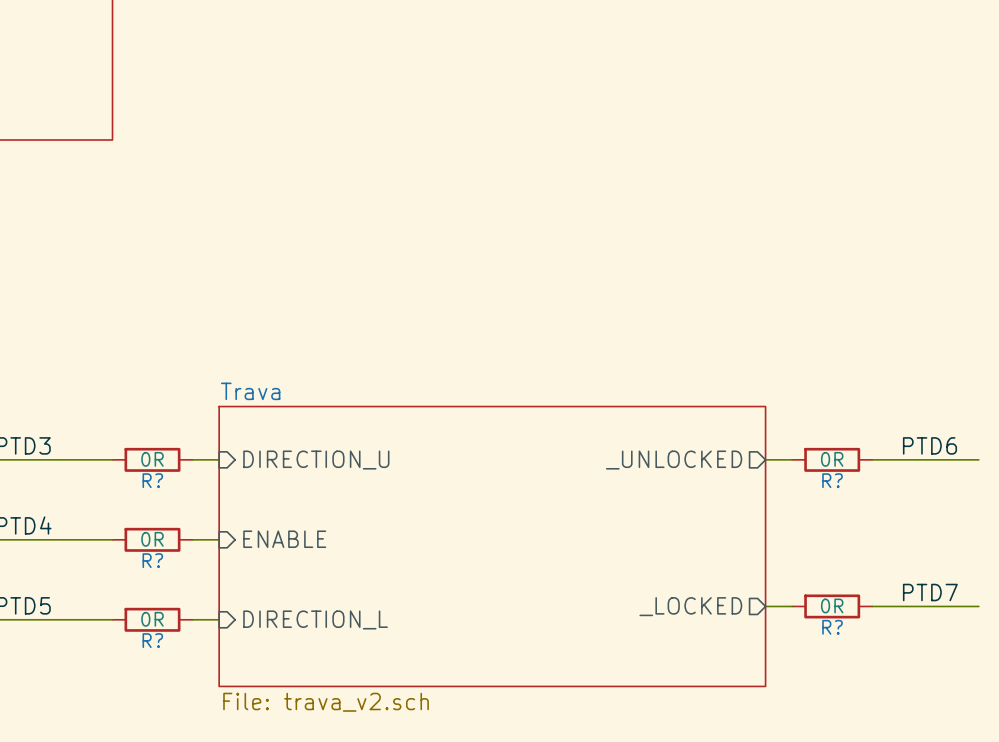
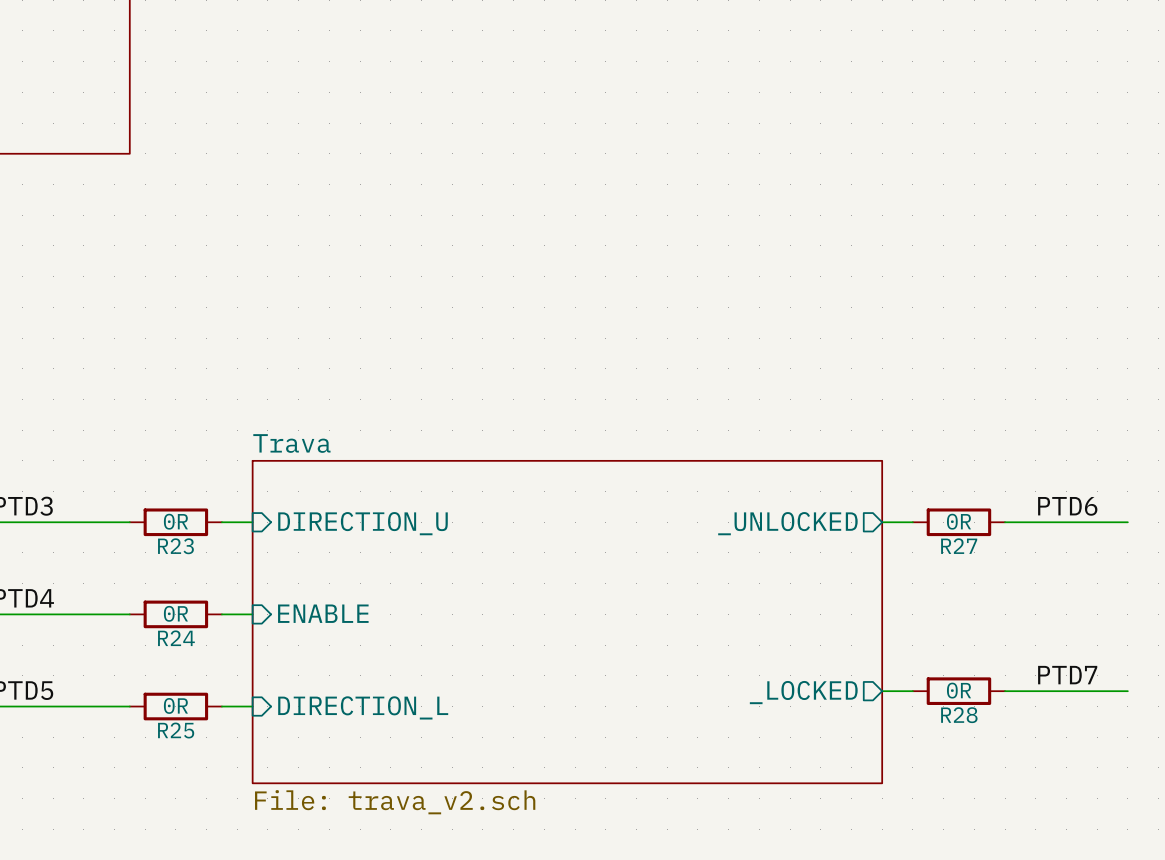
R? name: R? (152, 480) -> R23 (175, 546)
R? name: R? (832, 480) -> R27 (959, 546)
R? name: R? (152, 560) -> R24 (176, 638)
R? name: R? (832, 627) -> R28 (959, 715)
R? name: R? (152, 640) -> R25 (176, 730)

